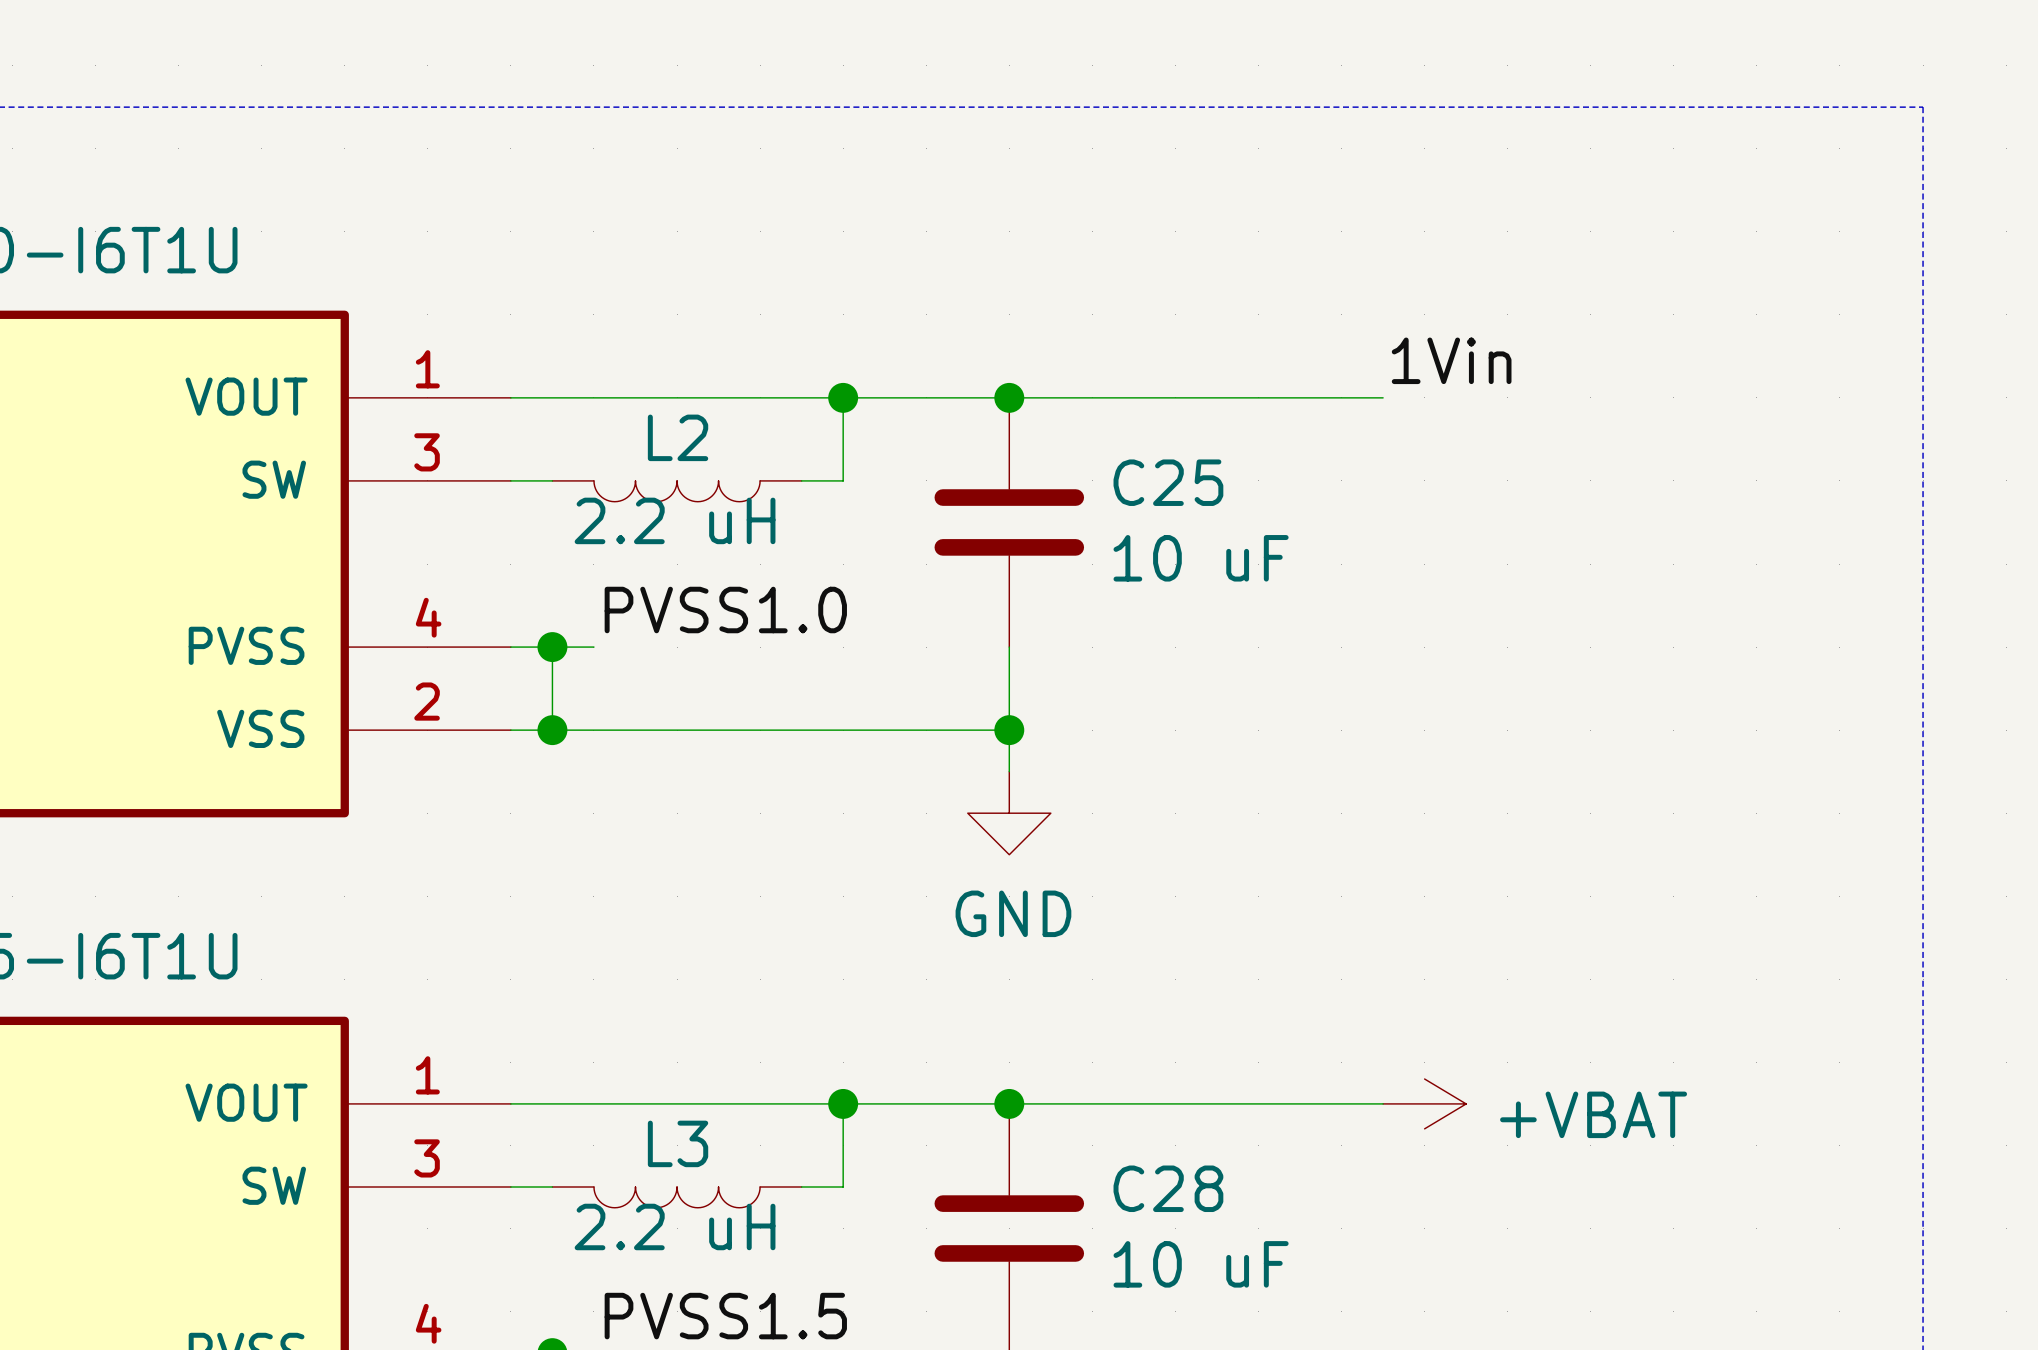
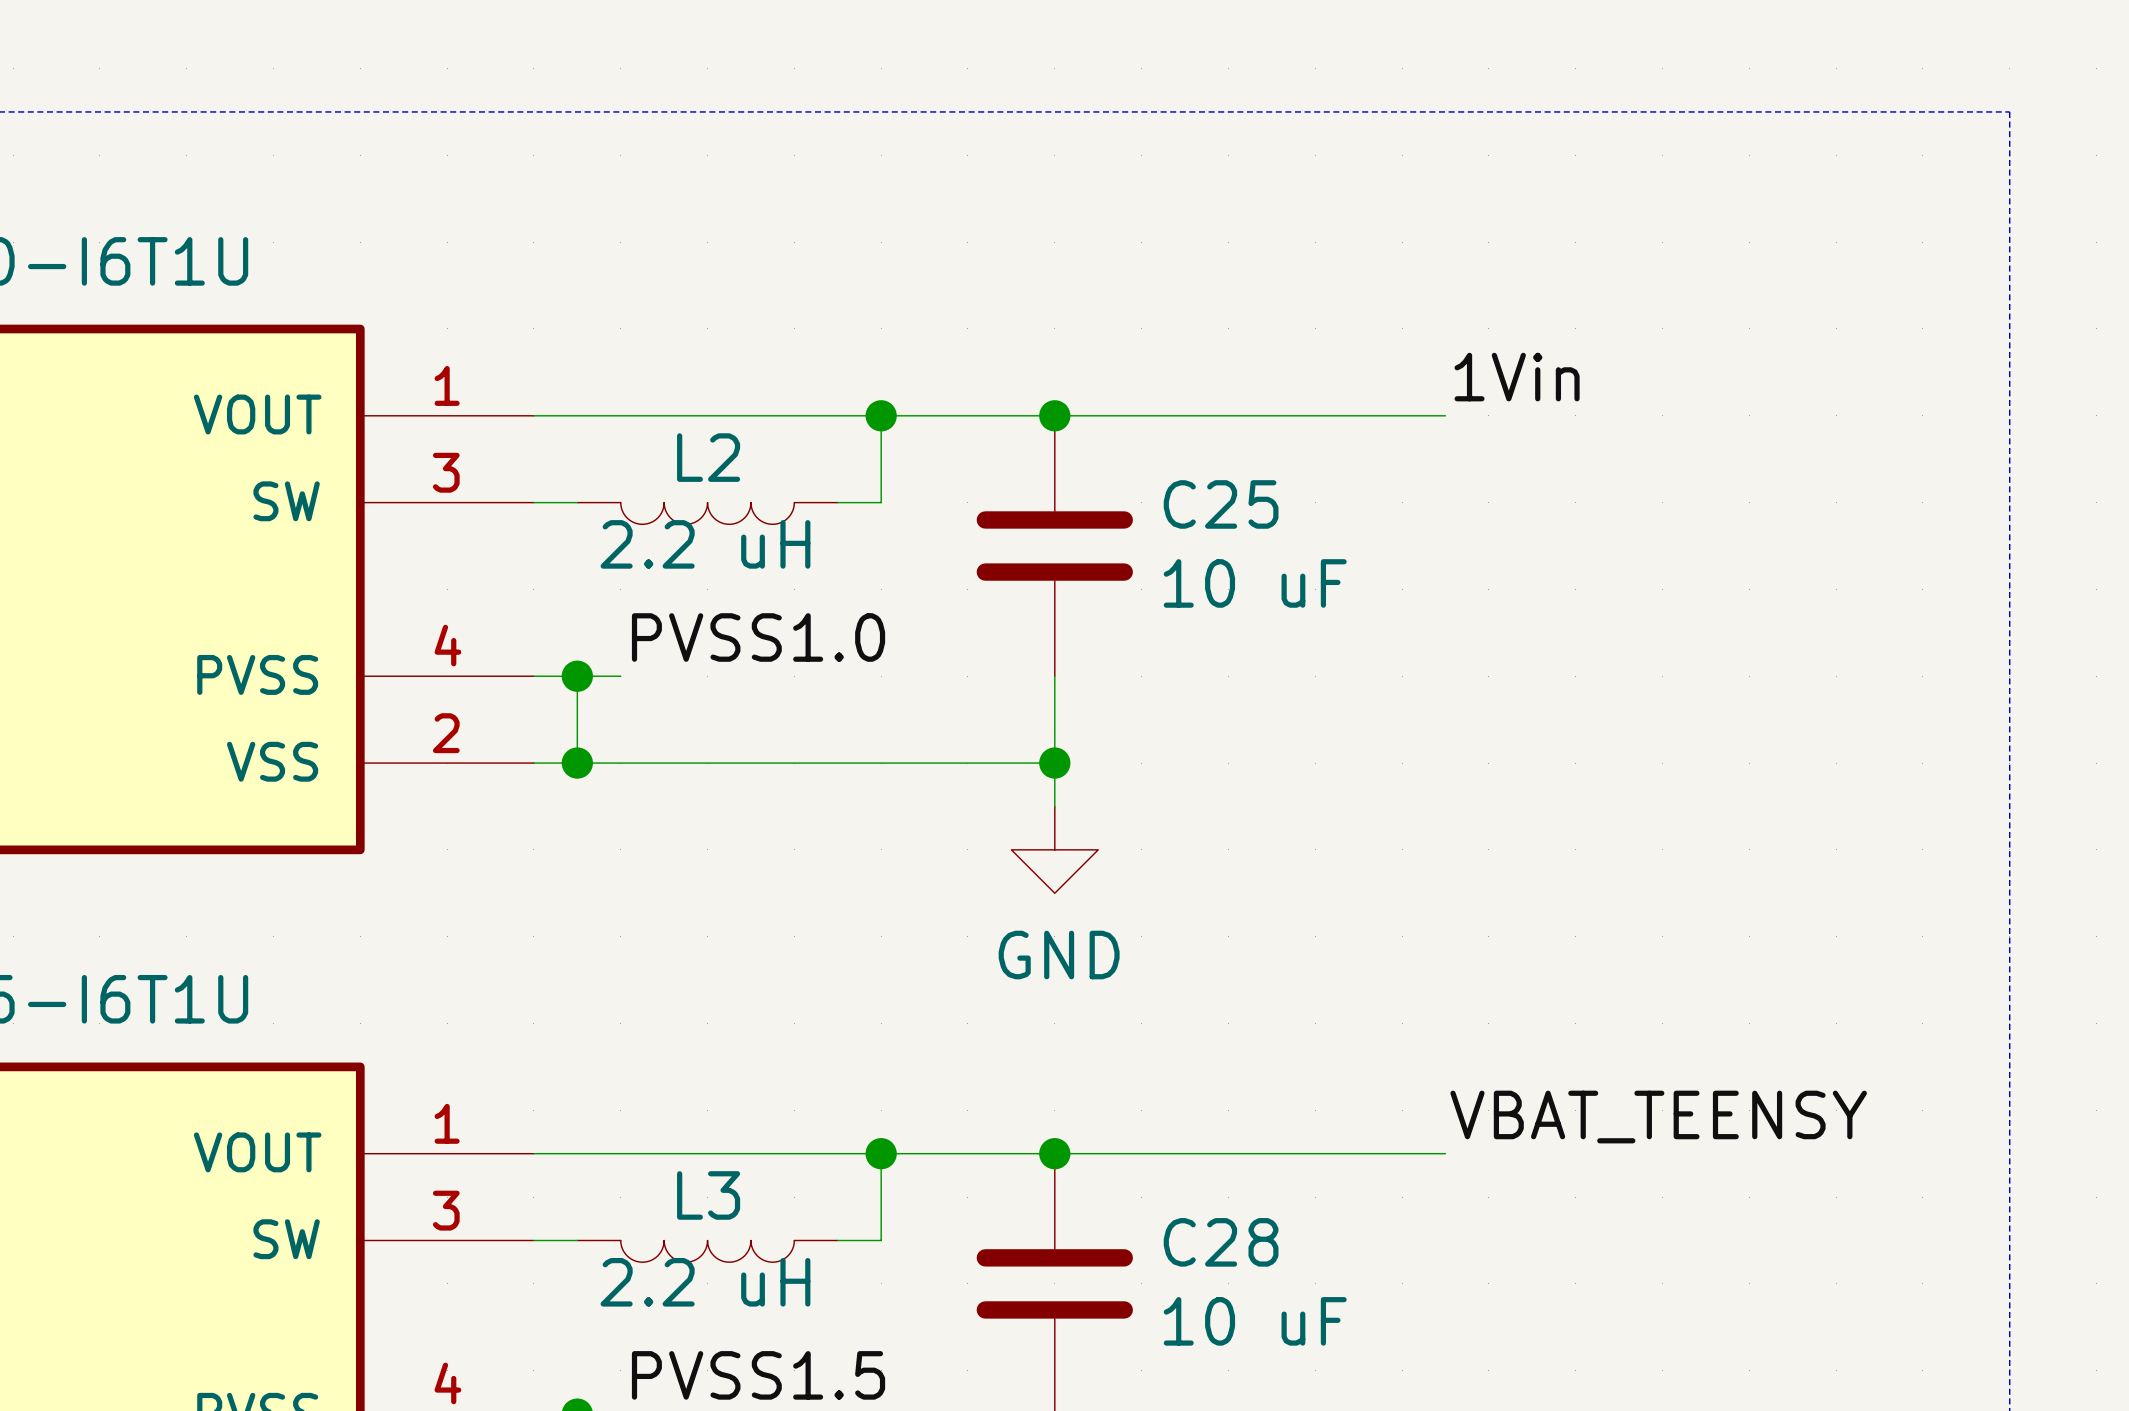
label: none -> VBAT_TEENSY (1658, 1117)
power symbol: +VBAT (1424, 1103) -> none

